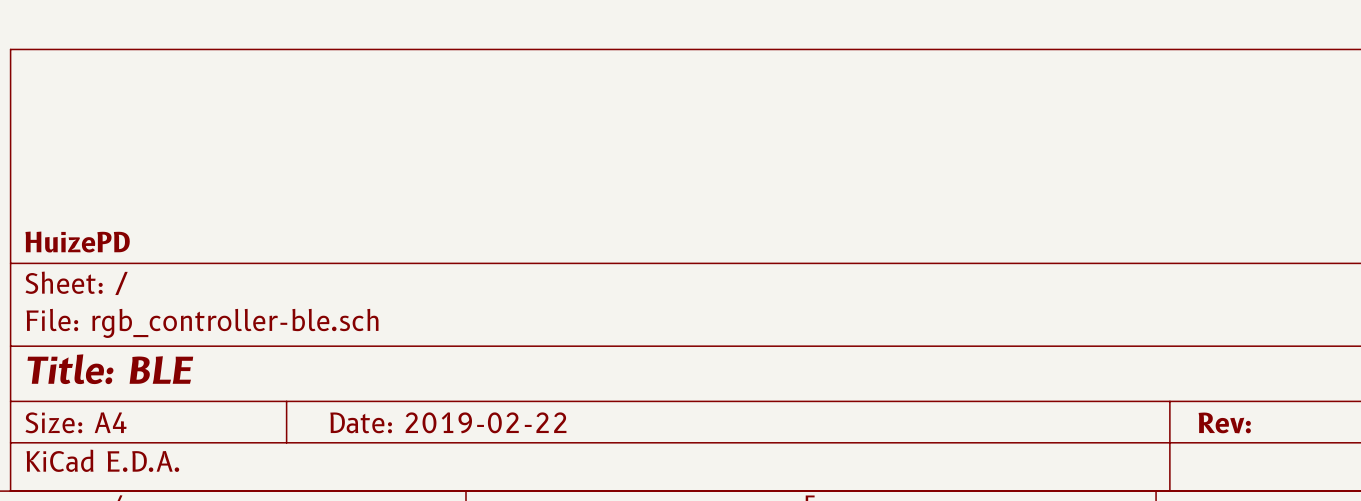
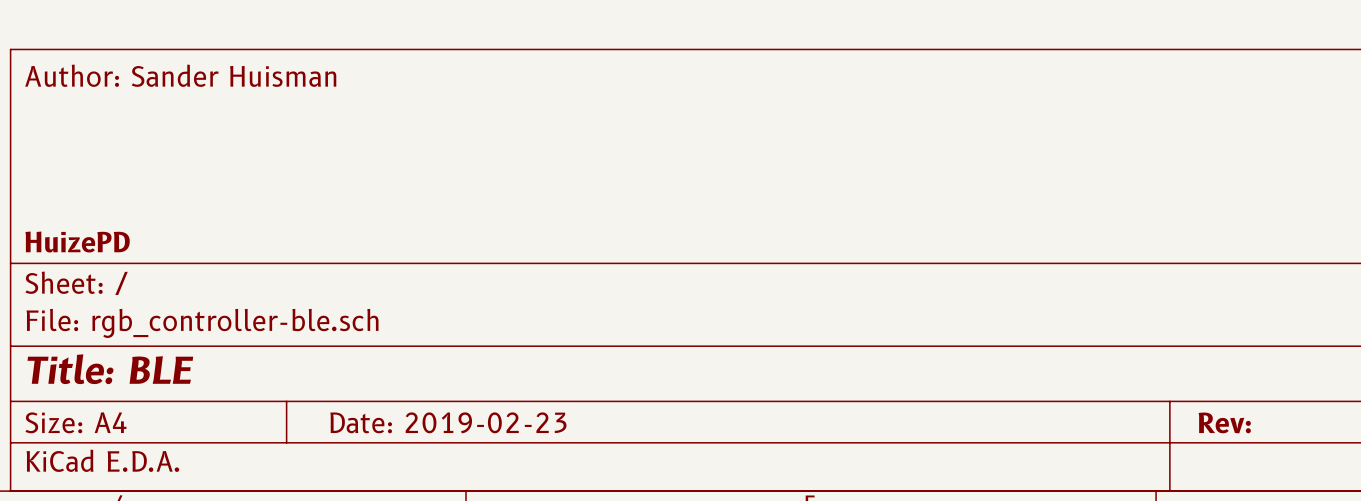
title block: none -> Author: Sander Huisman (180, 75)
title block: Date: 2019-02-22 (448, 422) -> Date: 2019-02-23 (448, 422)

